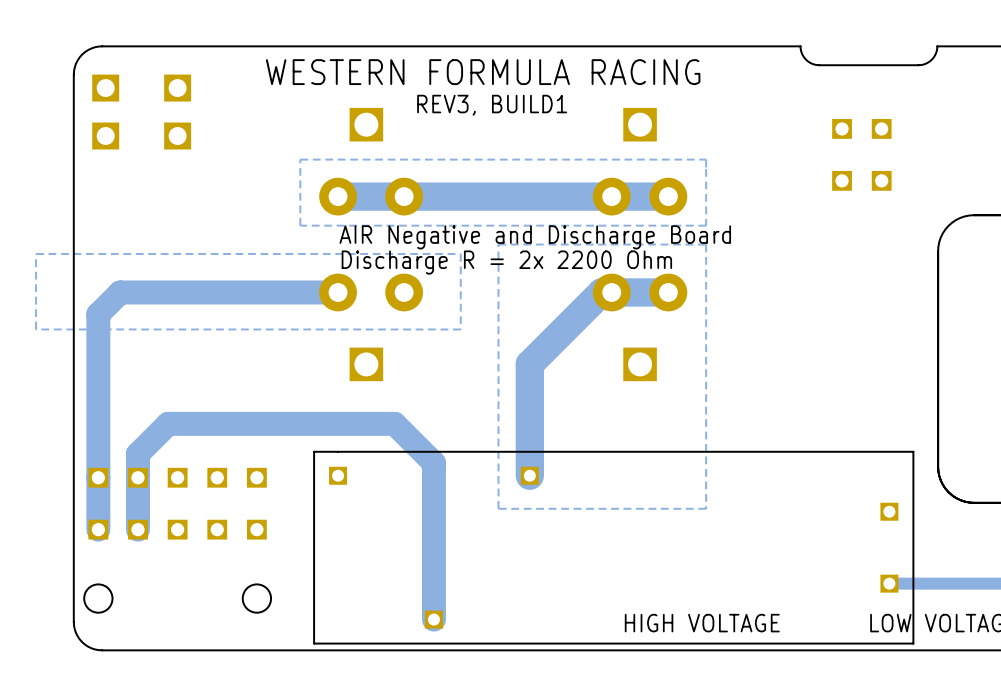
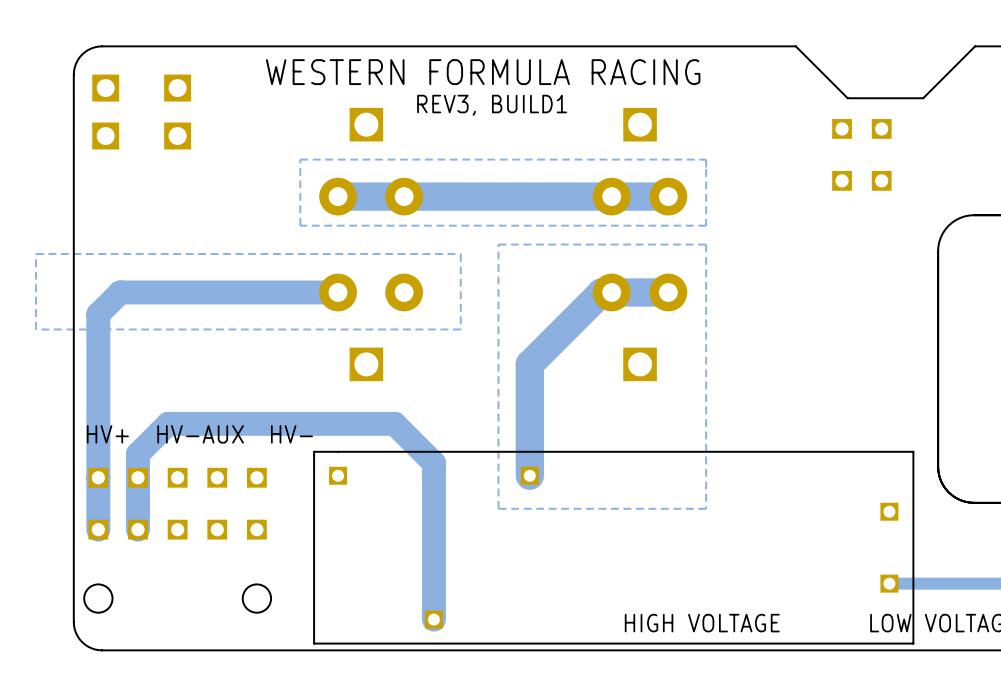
board edge: (975, 46) (937, 46) (931, 59) (918, 65) (816, 65) (806, 59) (800, 46) (795, 46) -> (975, 46) (923, 98) (847, 98) (795, 46)
text: AIR Negative and Discharge Board (535, 237) -> none
text: Discharge R = 2x 2200 Ohm (506, 262) -> none
text: none -> HV+ HV-AUX HV- (199, 434)

